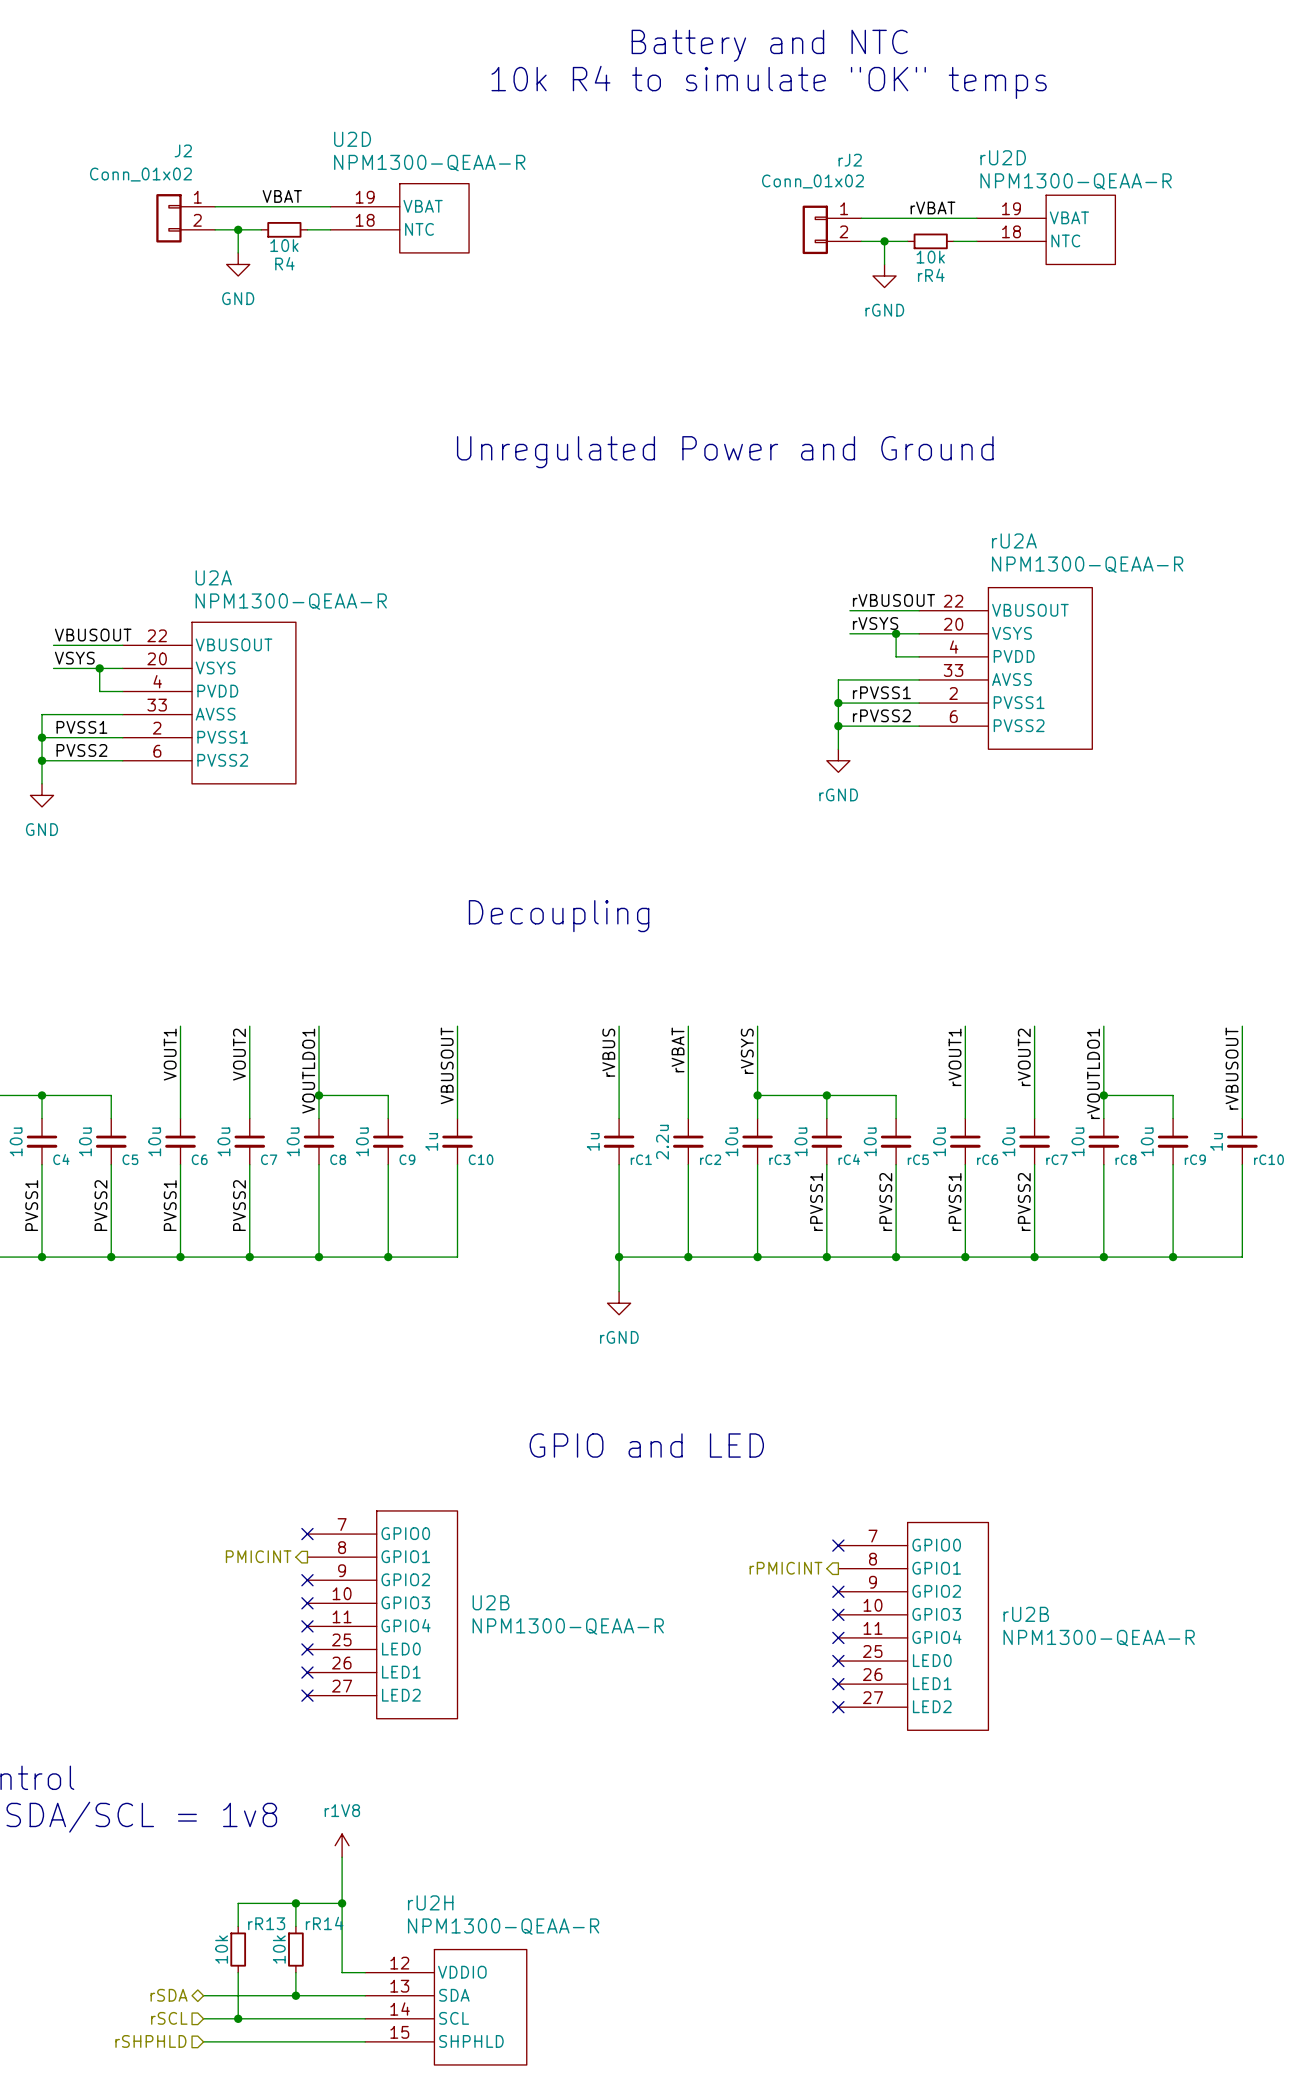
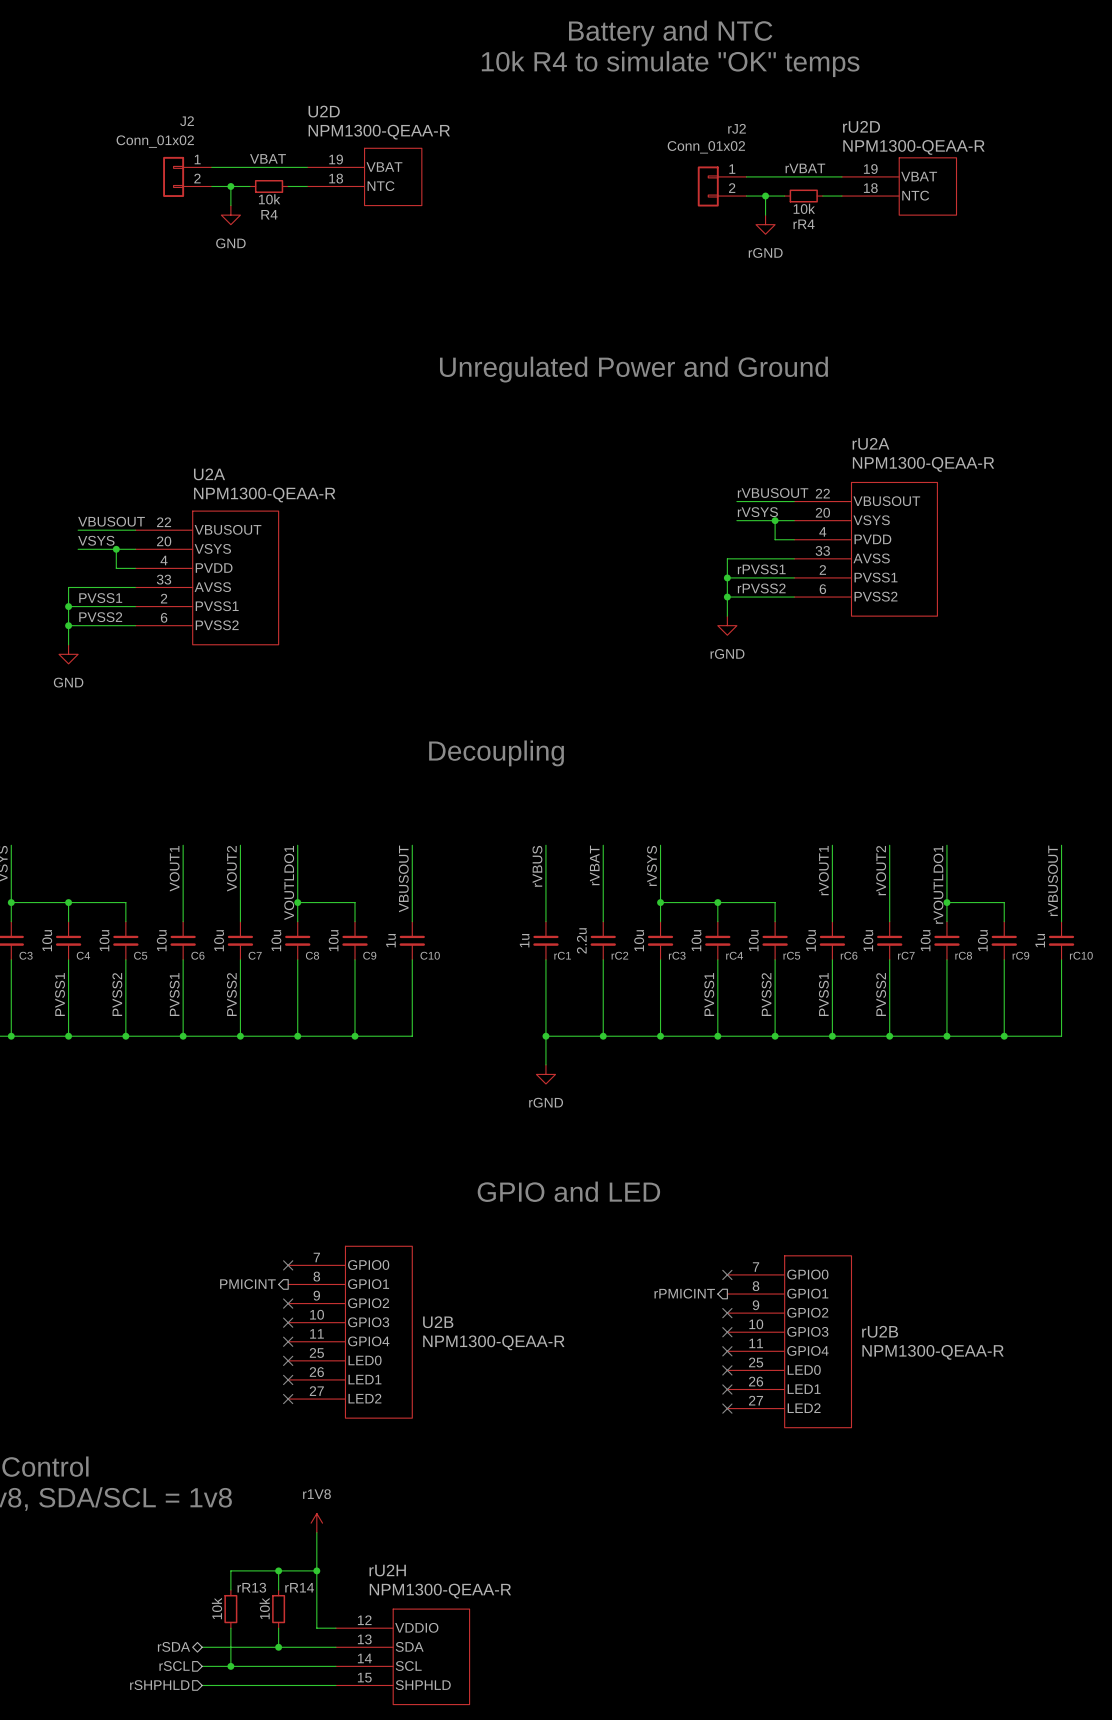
label: rPVSS1 (816, 1202) -> PVSS1 (709, 994)
label: rPVSS2 (885, 1202) -> PVSS2 (766, 994)
label: rPVSS1 (955, 1202) -> PVSS1 (823, 994)
label: rPVSS2 (1024, 1202) -> PVSS2 (881, 994)

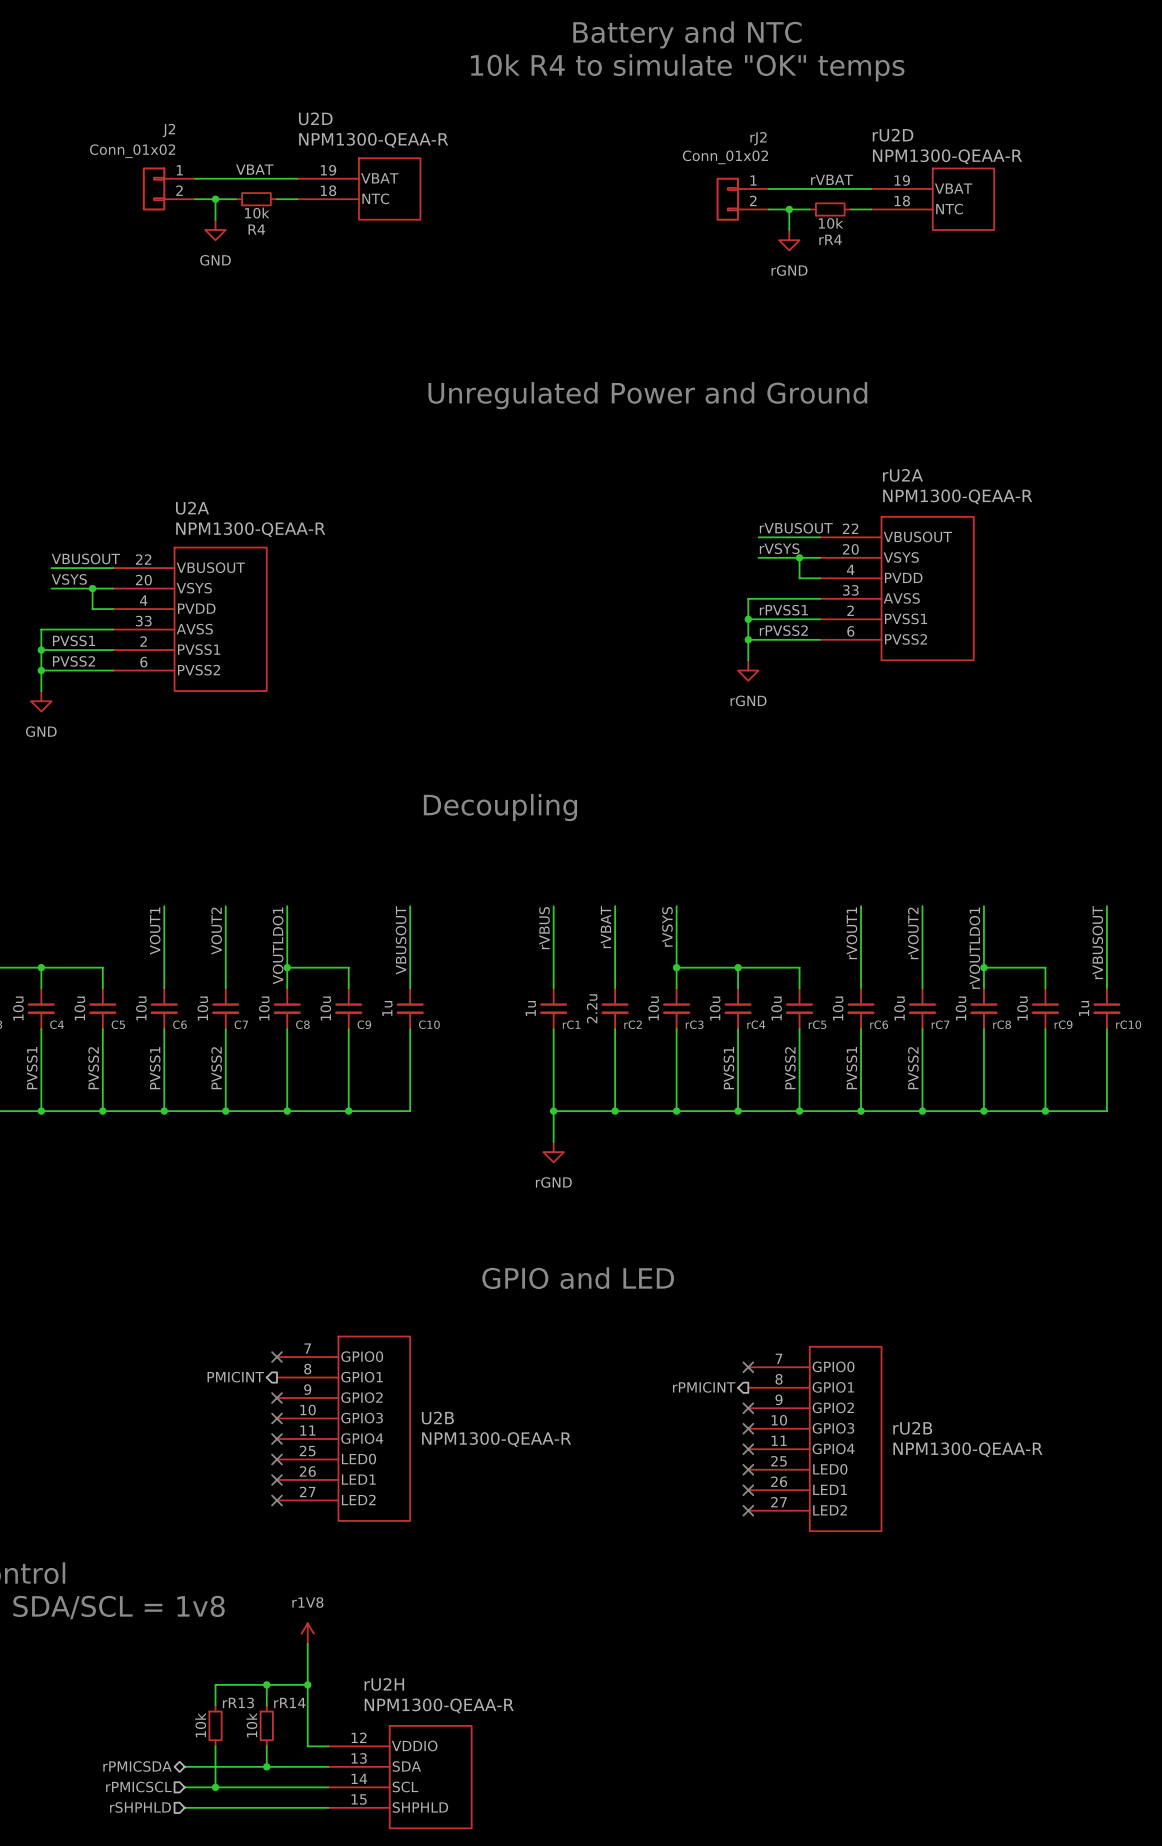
hierarchical label: rSDA (173, 1646) -> rPMICSDA (137, 1766)
hierarchical label: rSCL (174, 1666) -> rPMICSCL (138, 1786)

